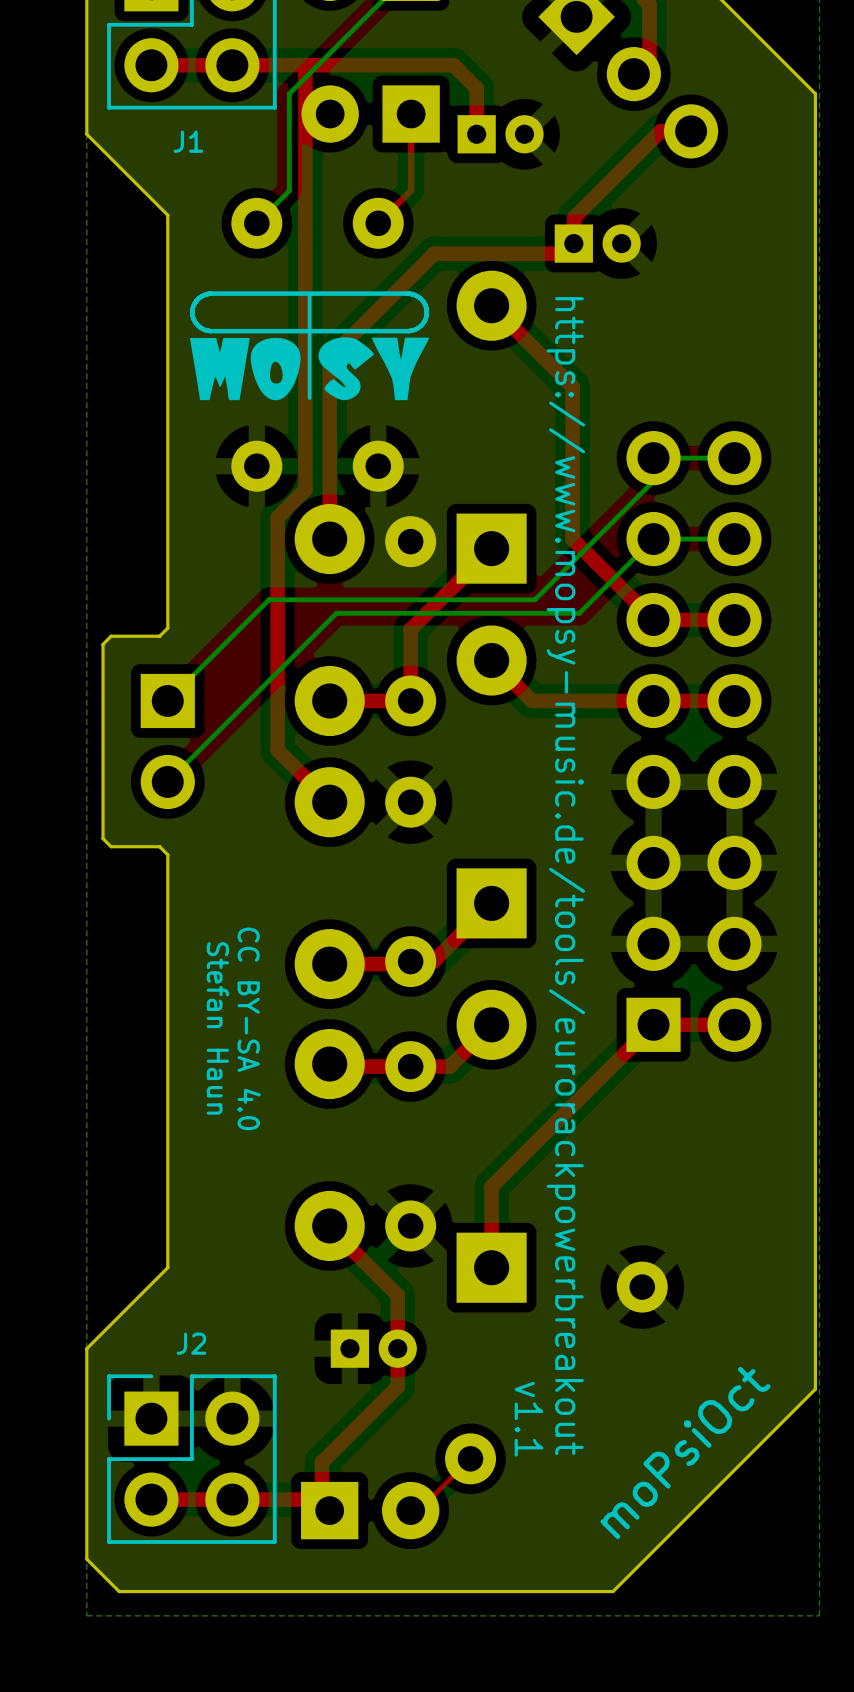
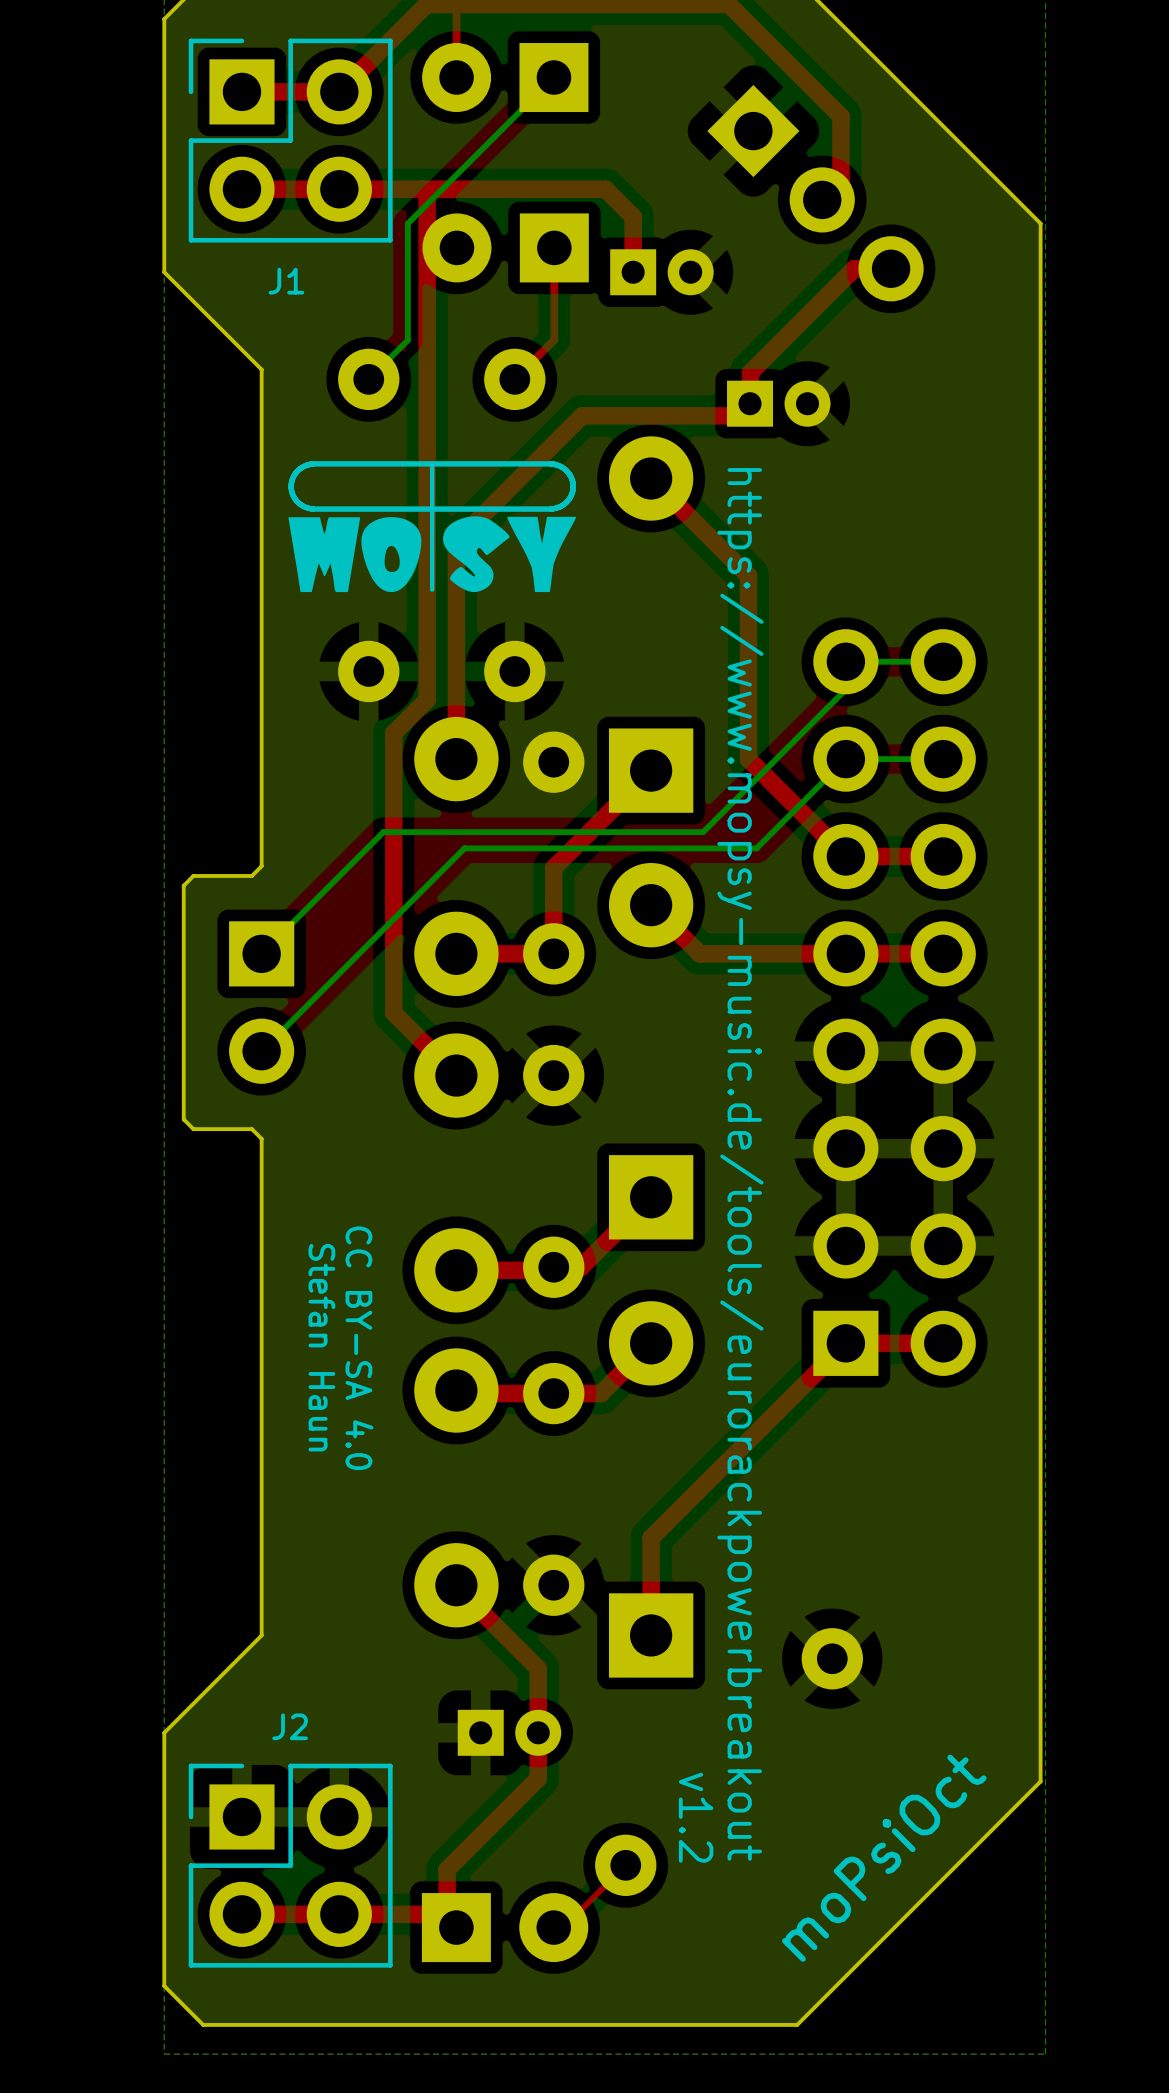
text: v1.1 (529, 1419) -> v1.2 (696, 1817)

